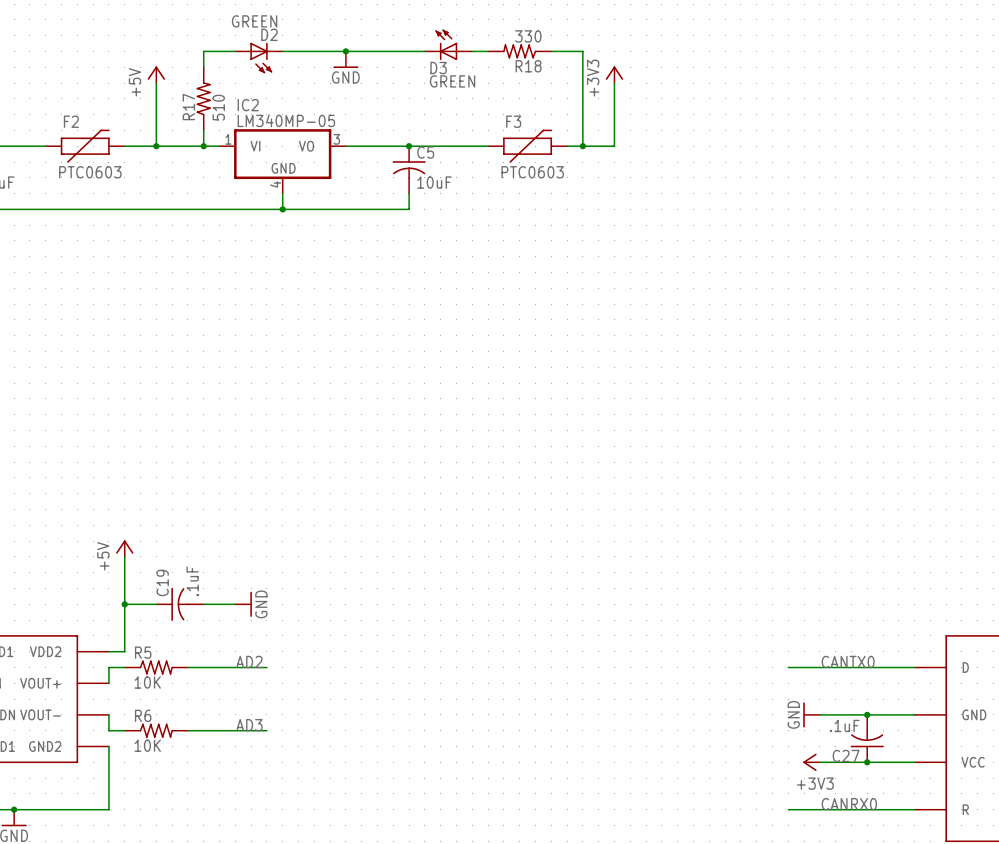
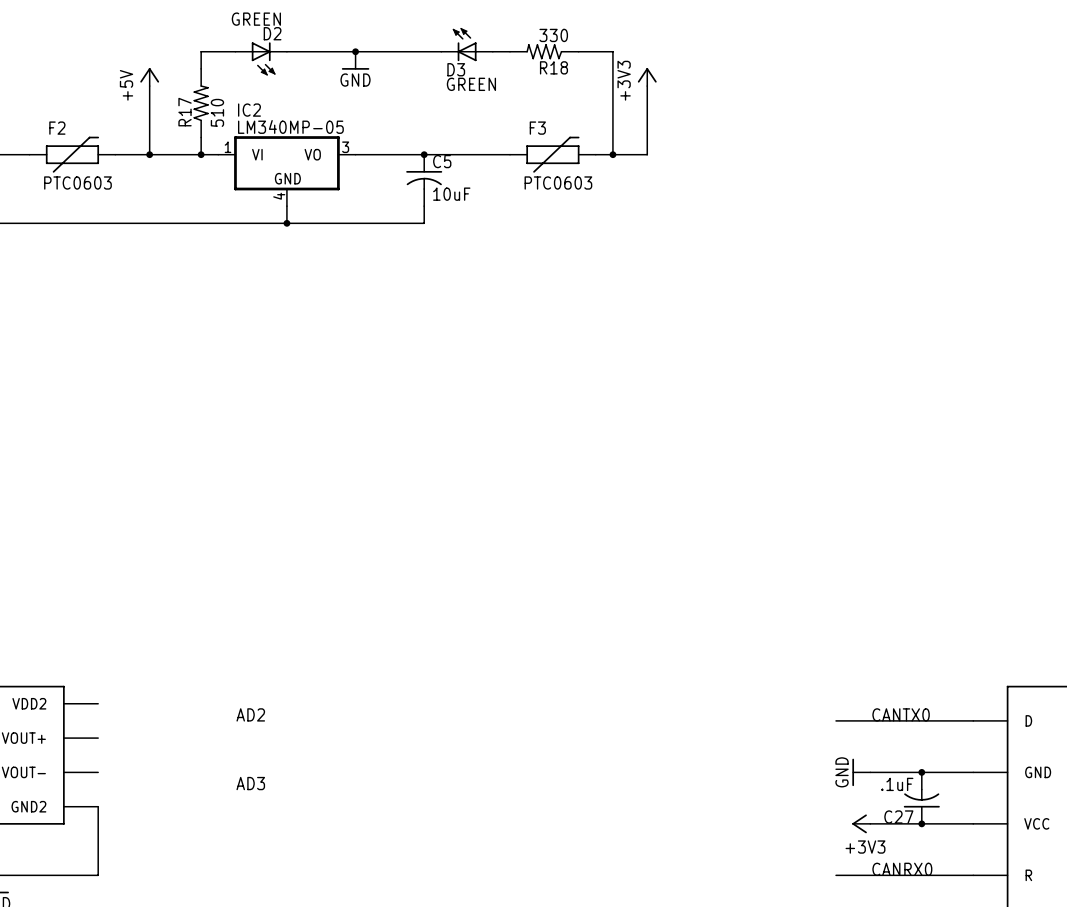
power symbol: +5V (124, 548) -> none
wire: (124, 556) (124, 651) (108, 651) -> none
wire: (124, 604) (156, 604) -> none
junction: (124, 604) -> none
C19: .1uF (180, 604) -> none
wire: (203, 604) (235, 604) -> none
power symbol: GND (243, 604) -> none
wire: (124, 667) (108, 667) (108, 683) -> none
R5: 10K (156, 667) -> none
wire: (187, 667) (266, 667) -> none
wire: (108, 714) (108, 730) (124, 730) -> none
R6: 10K (156, 730) -> none
wire: (187, 730) (266, 730) -> none

